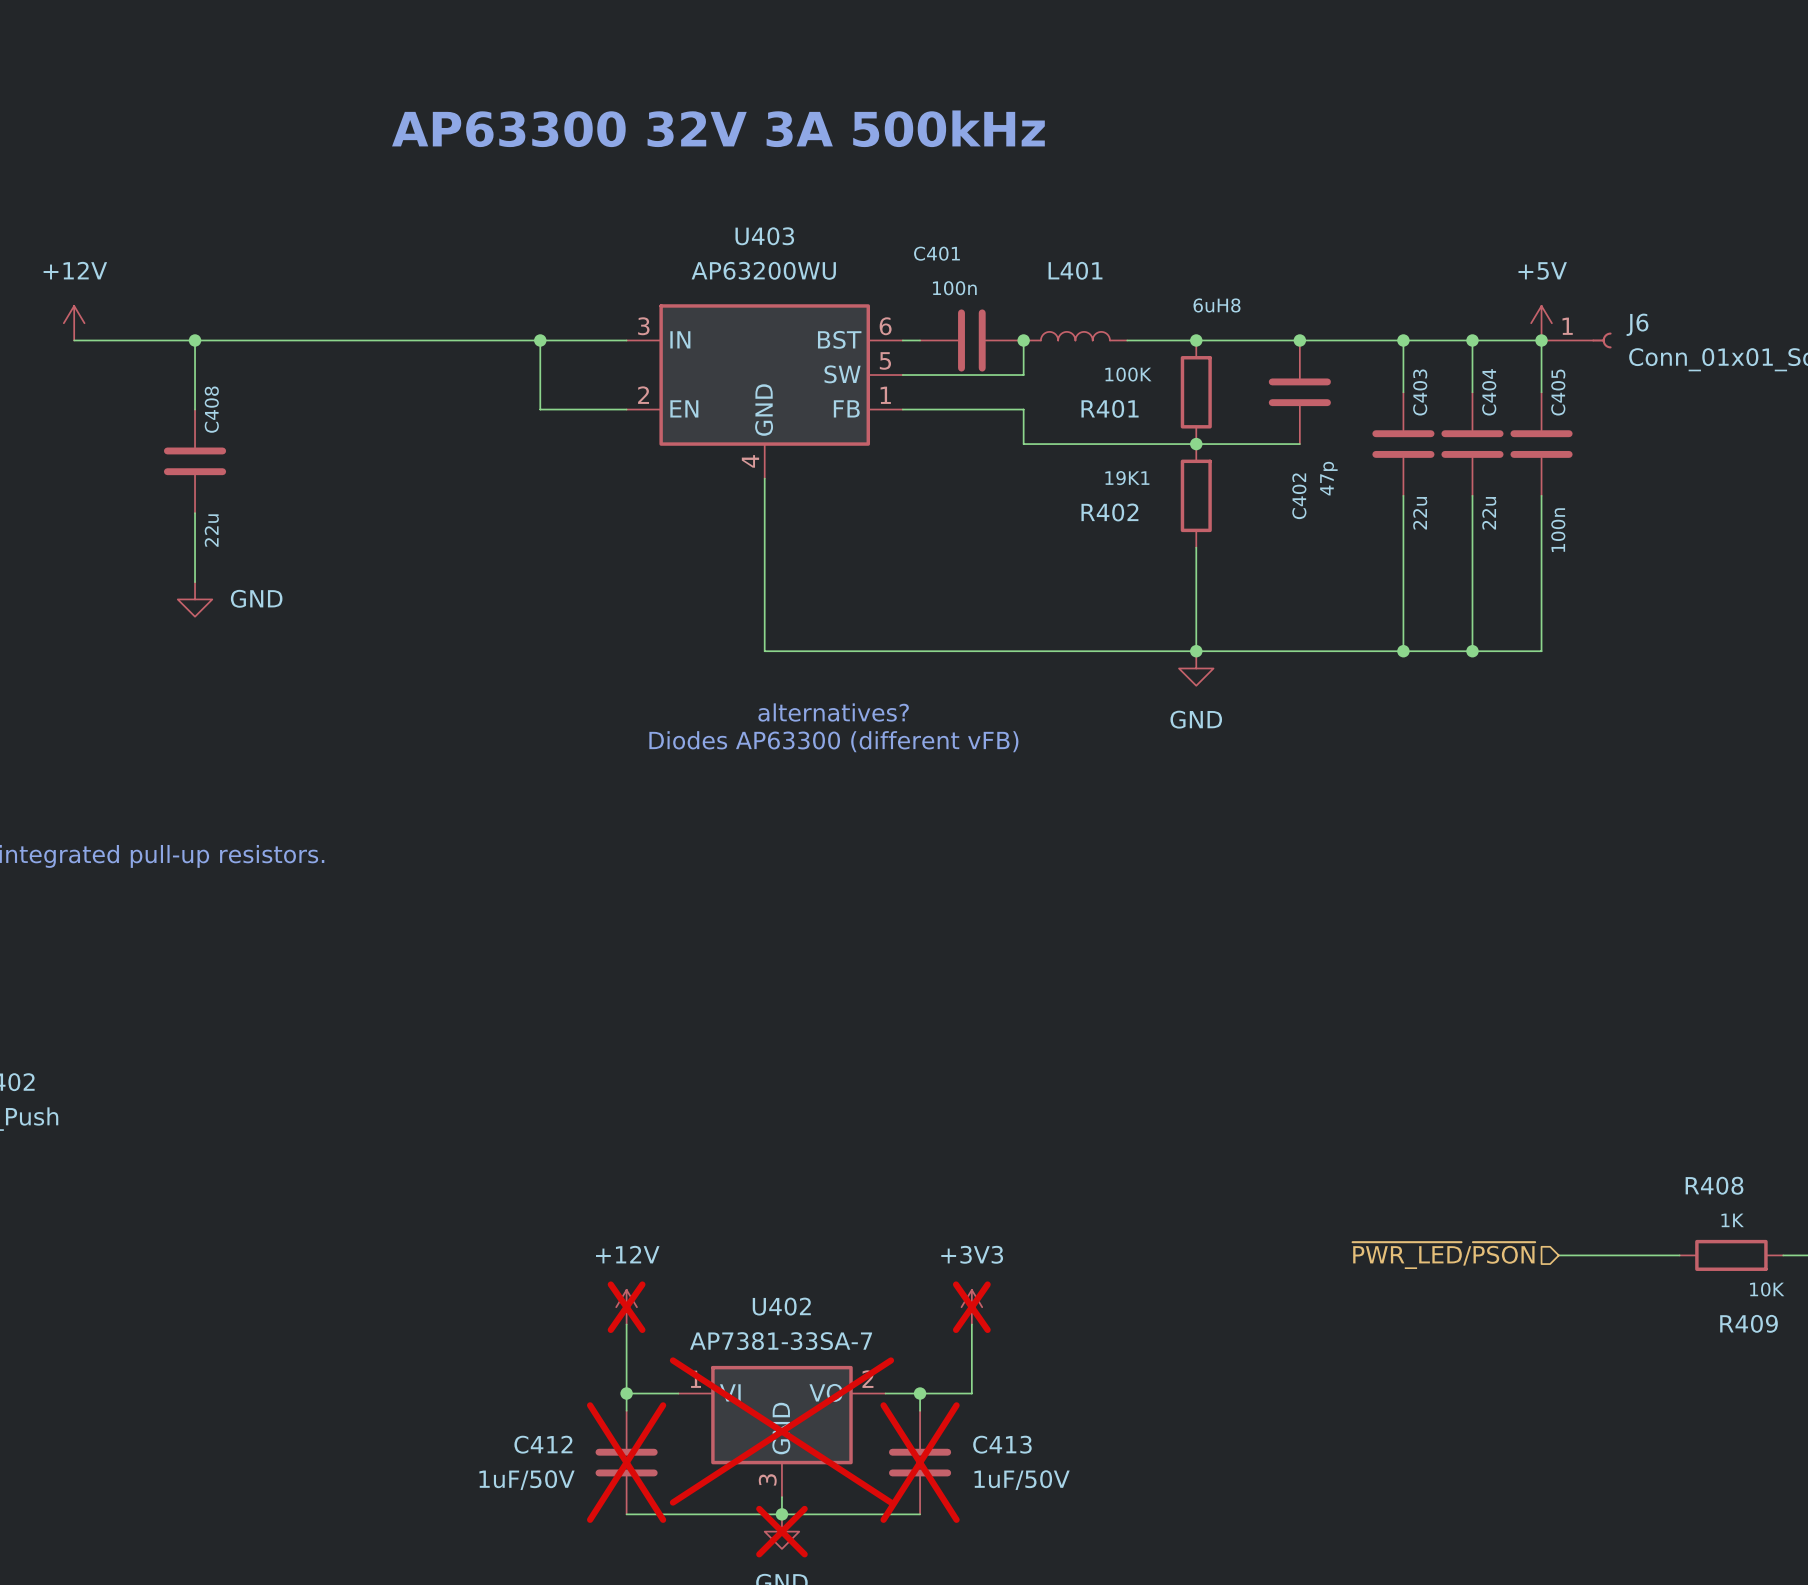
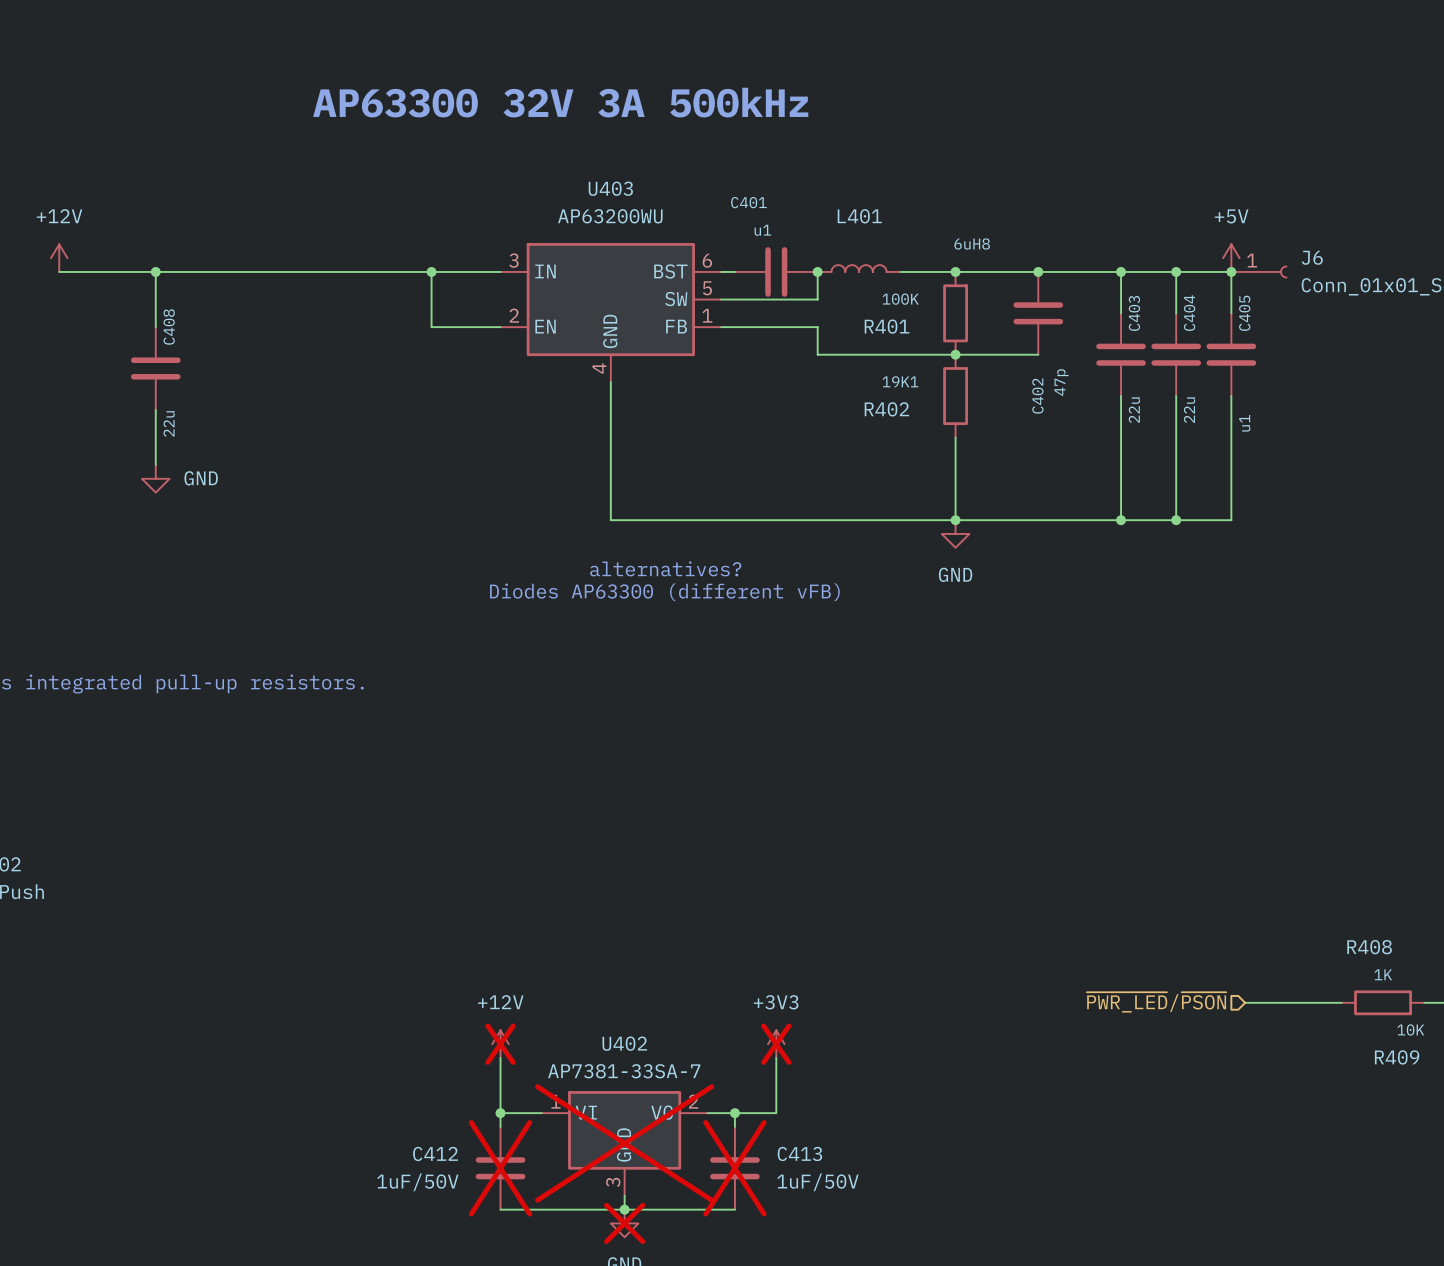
C401 value: 100n (954, 288) -> u1 (762, 230)
C405 value: 100n (1558, 530) -> u1 (1244, 423)

